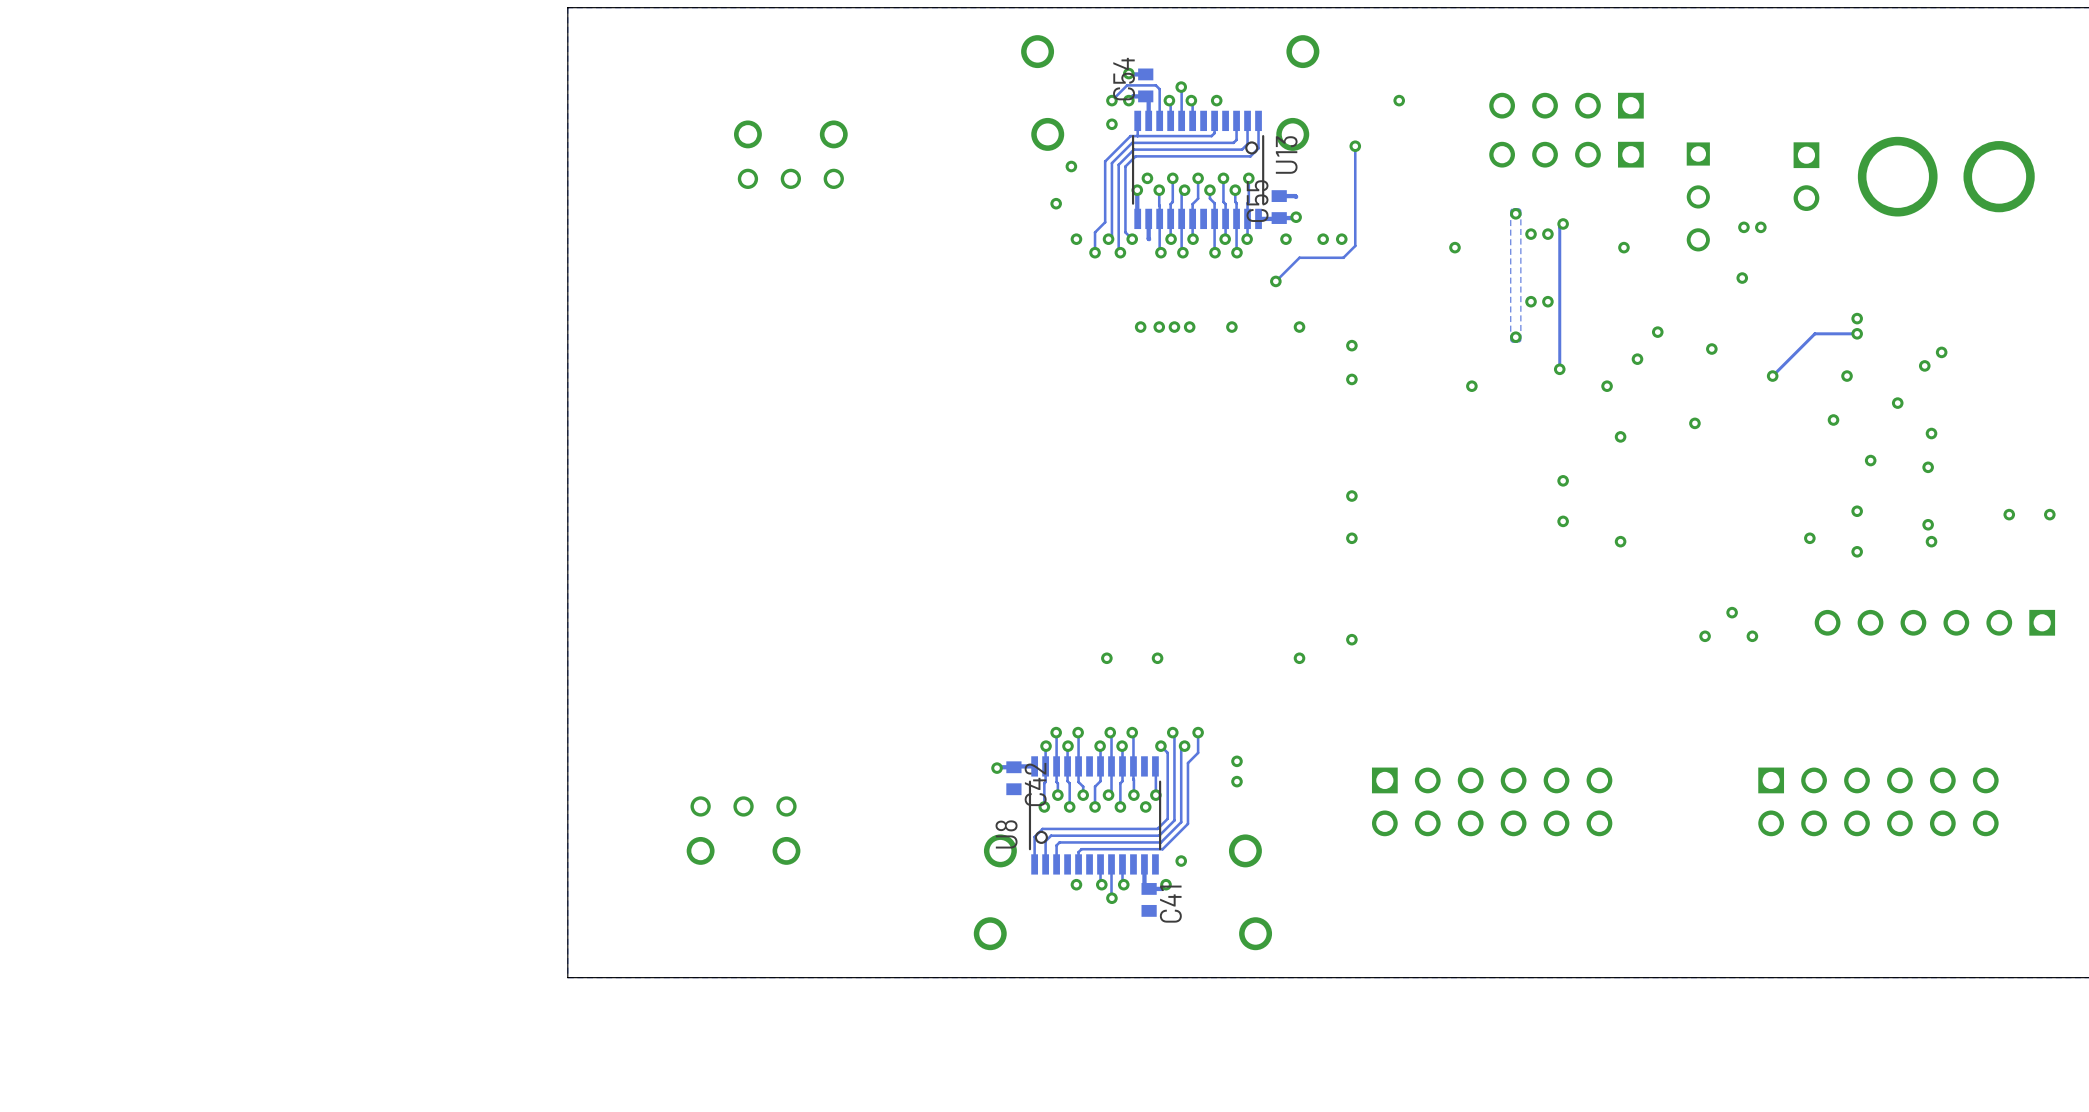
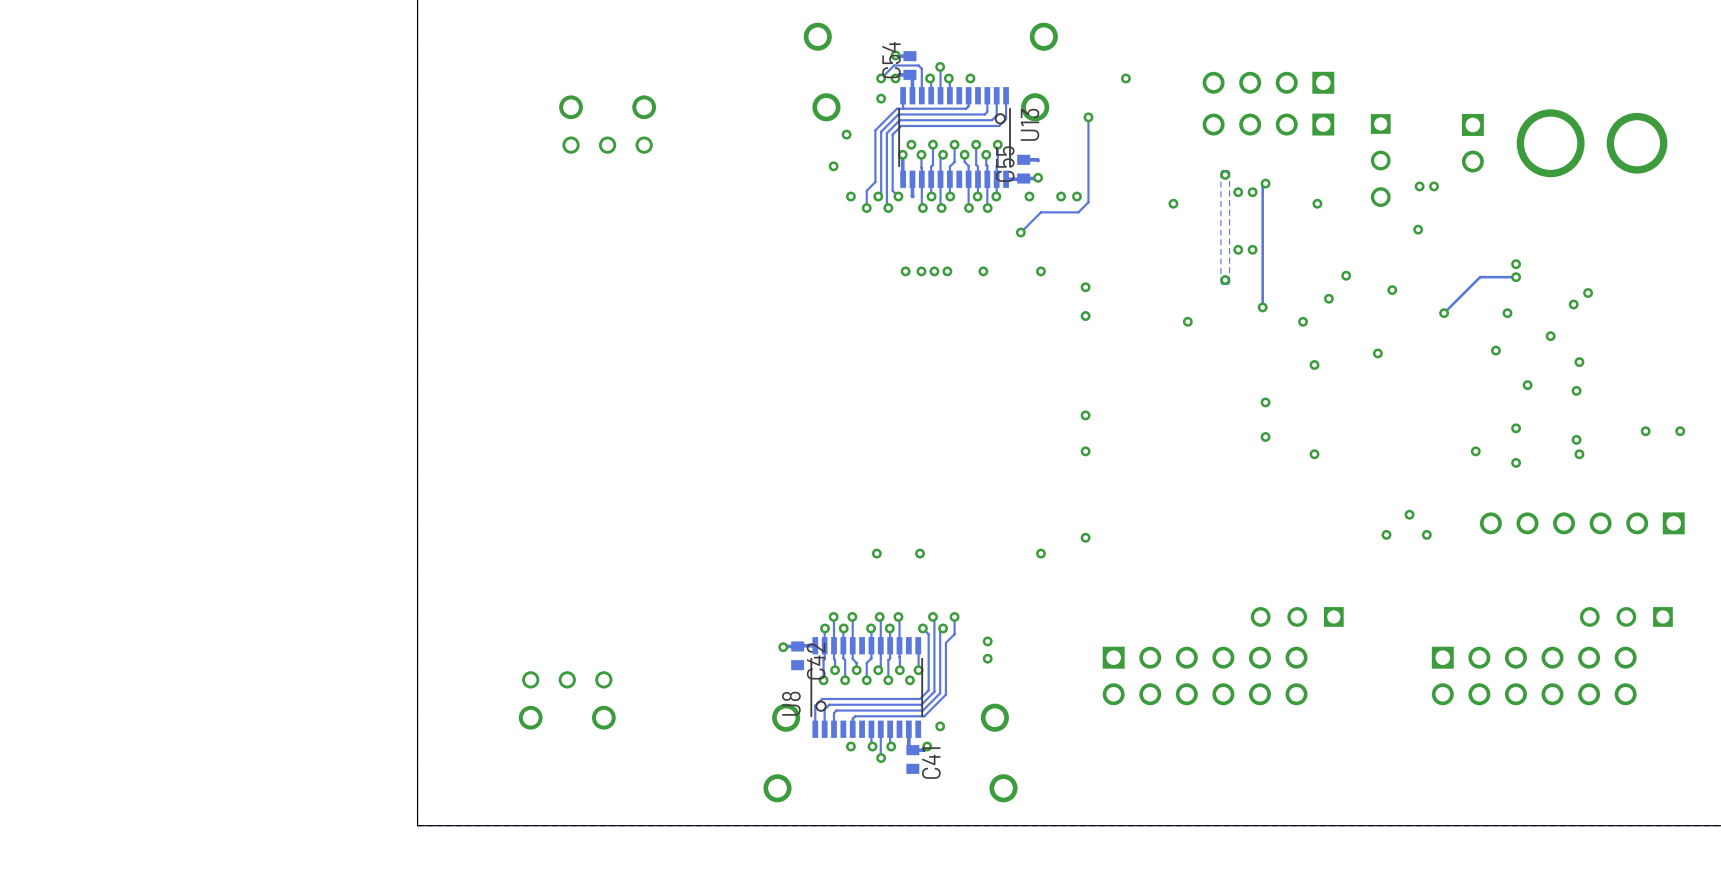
part: none -> (1297, 616)
part: none -> (1626, 616)

